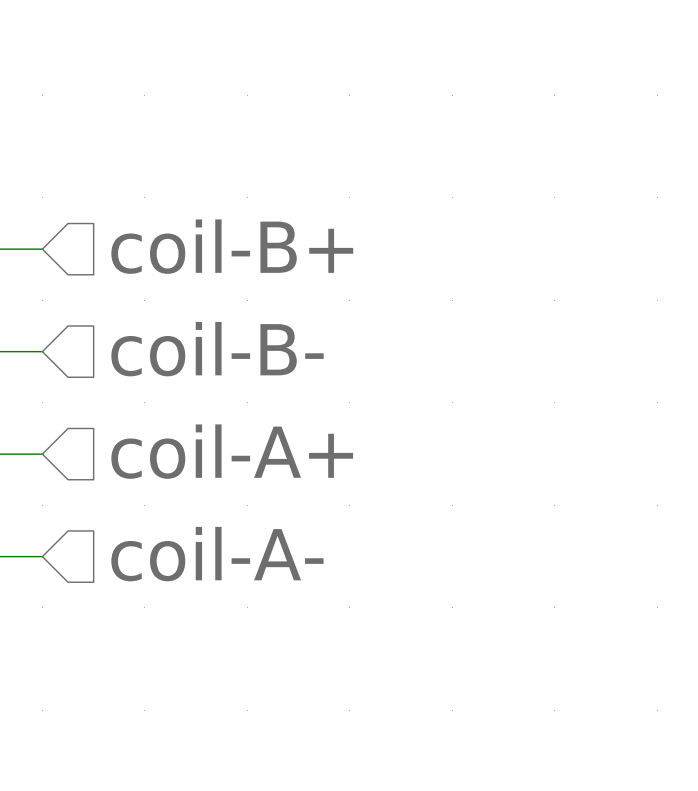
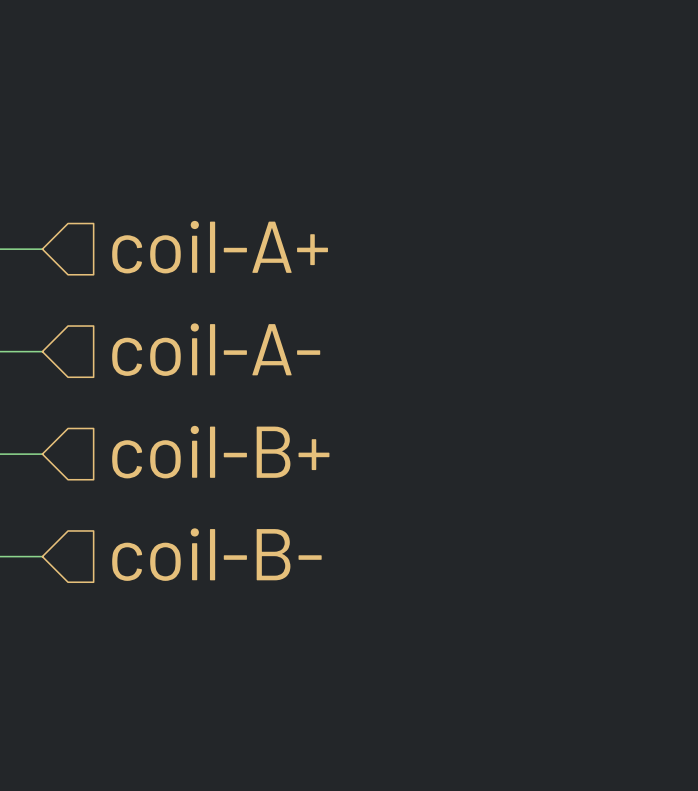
hierarchical label: coil-B+ (232, 246) -> coil-A+ (220, 247)
hierarchical label: coil-B- (217, 349) -> coil-A- (216, 349)
hierarchical label: coil-A+ (232, 451) -> coil-B+ (220, 452)
hierarchical label: coil-A- (217, 554) -> coil-B- (216, 554)

